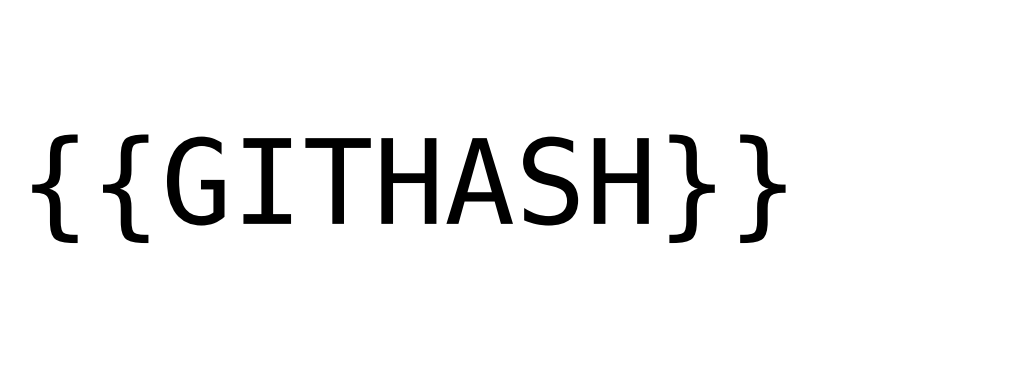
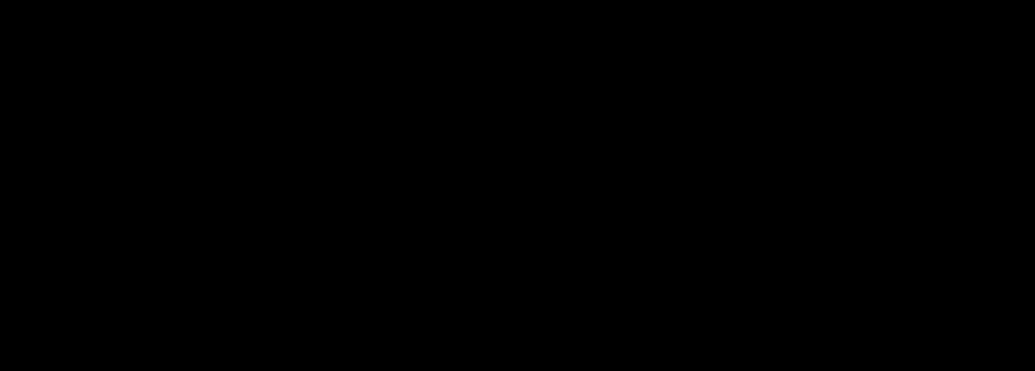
text: {{GITHASH}} (408, 188) -> none

